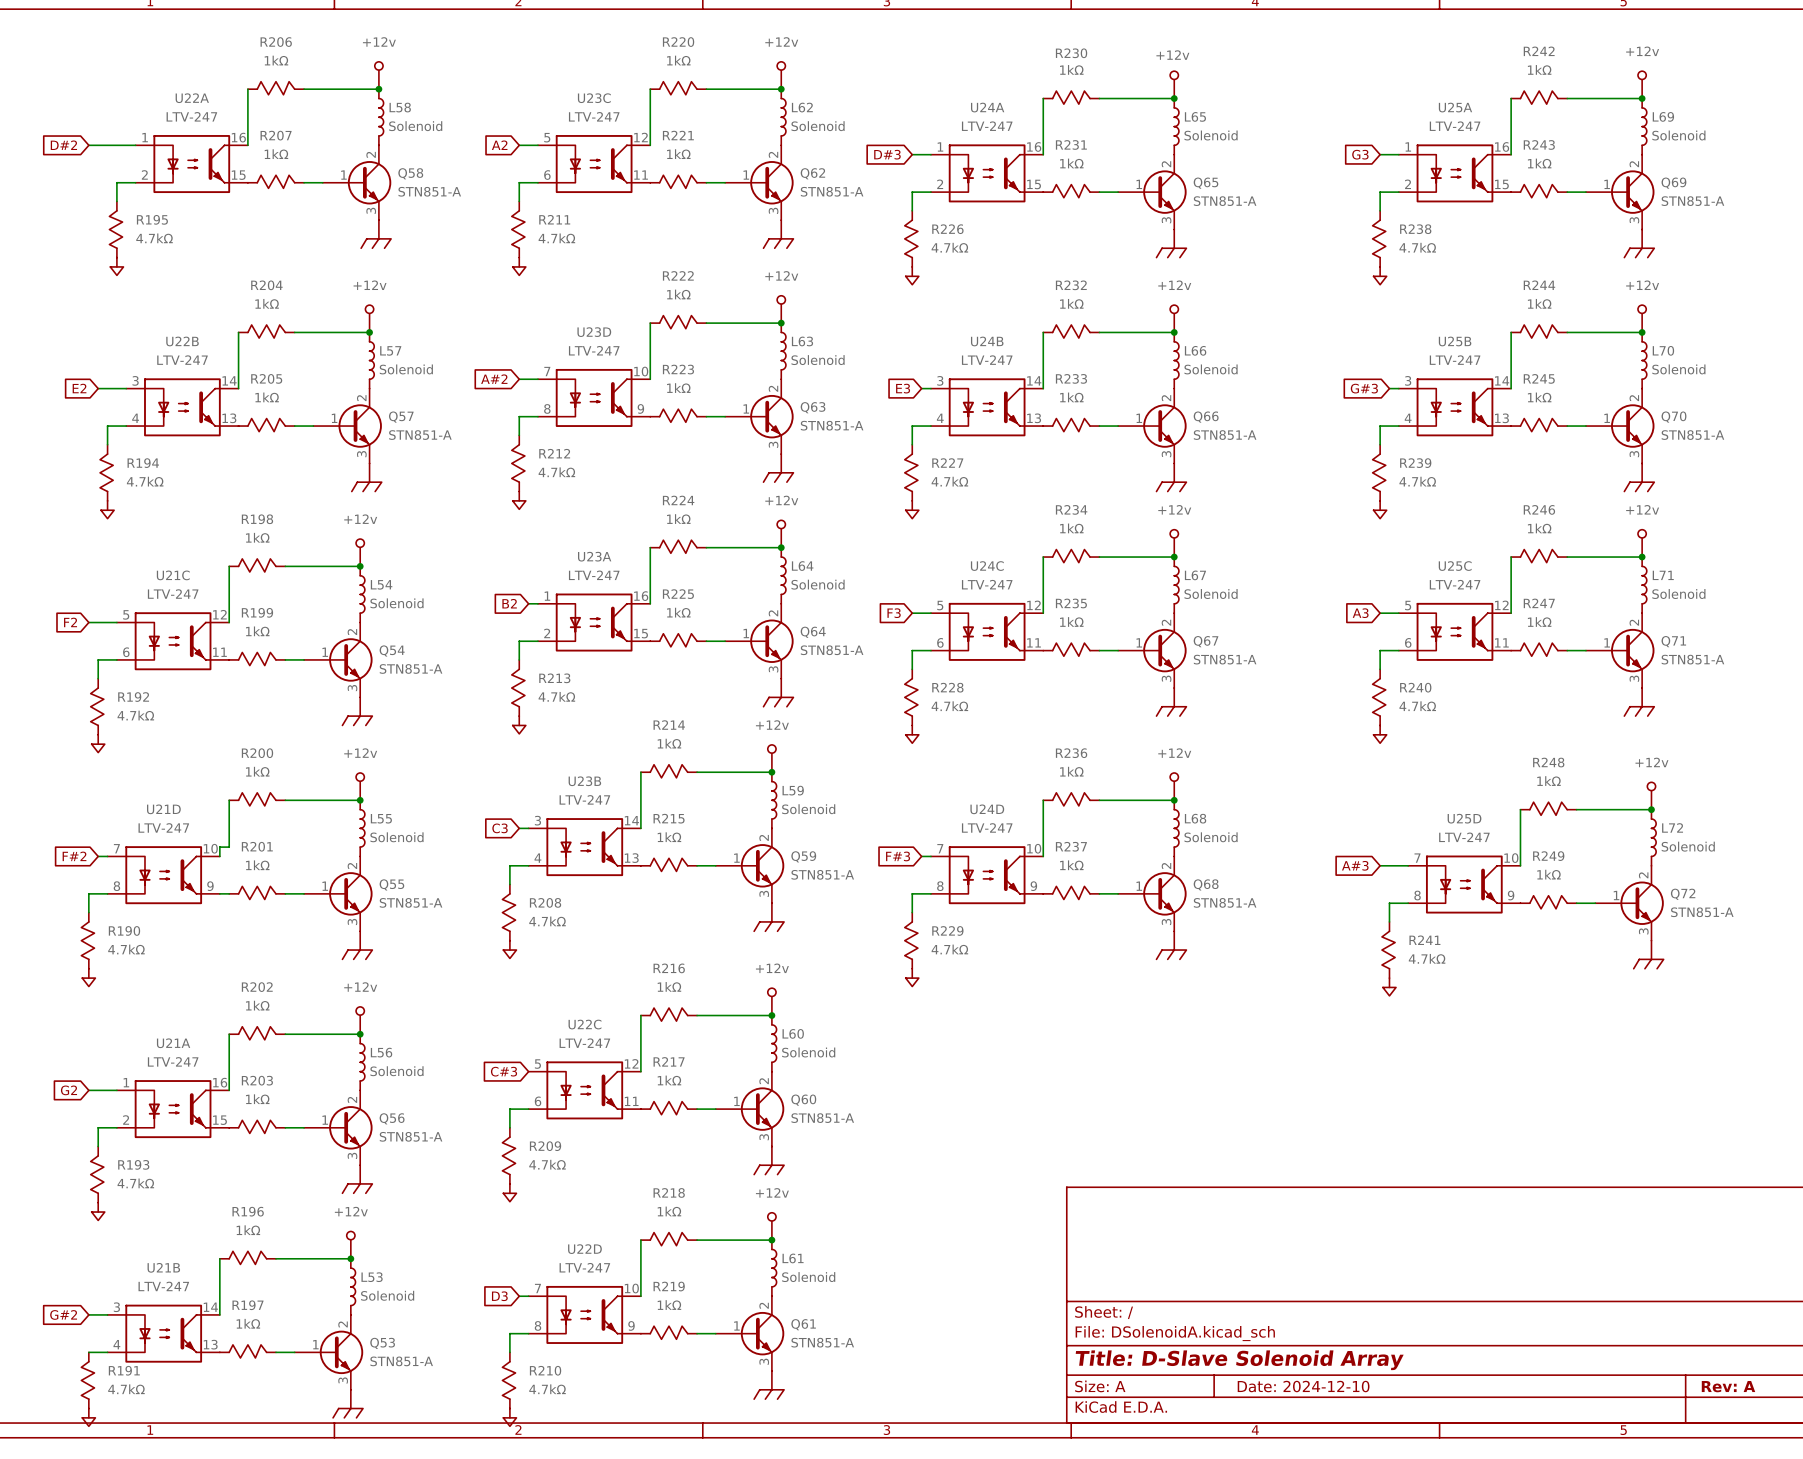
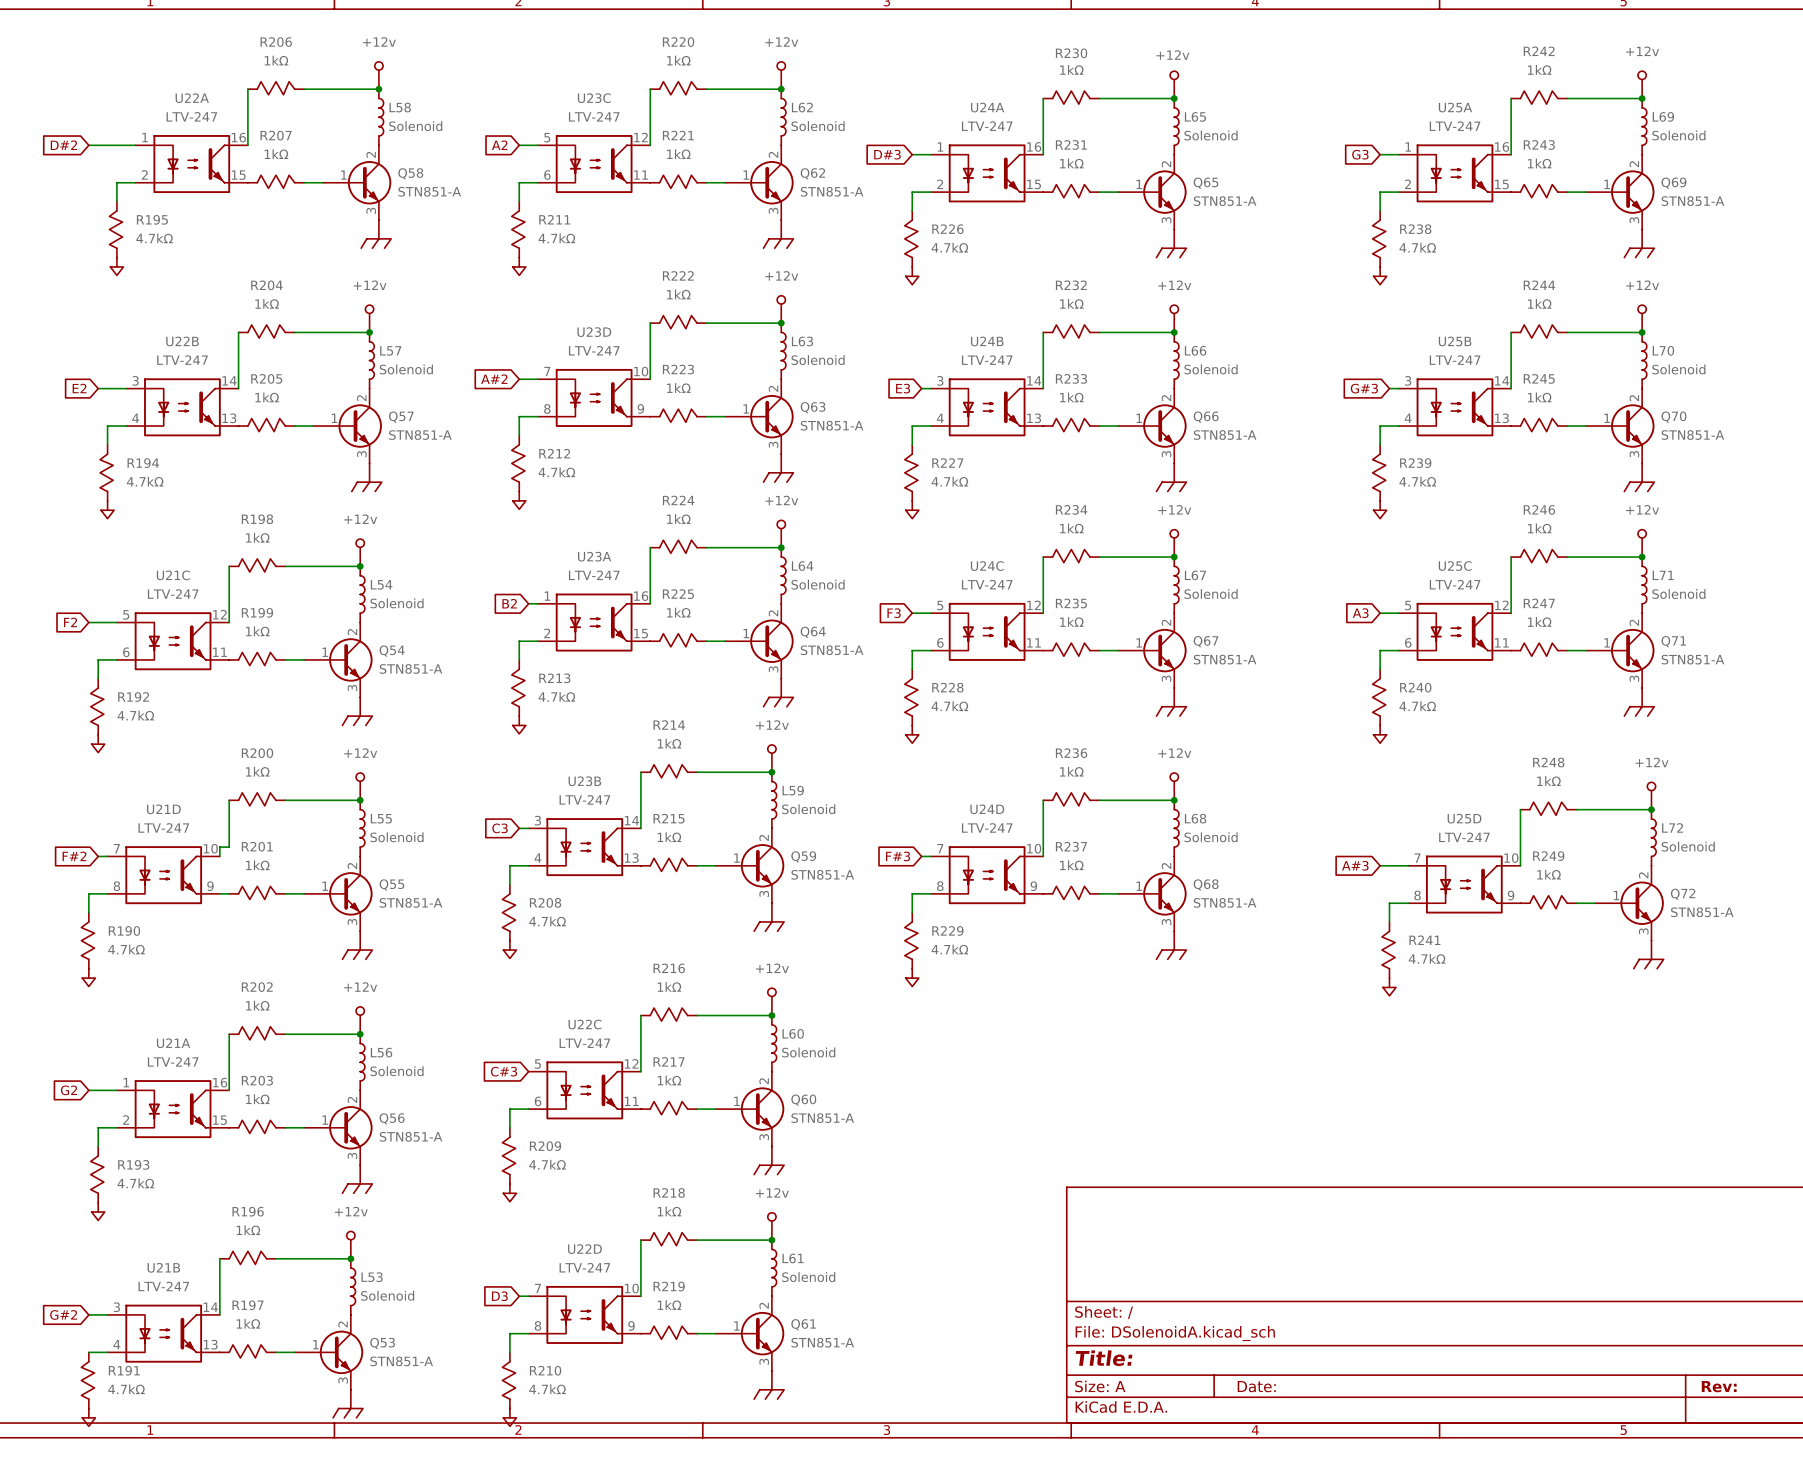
title block: Title: D-Slave Solenoid Array (1239, 1360) -> Title: (1104, 1358)
title block: Date: 2024-12-10 (1303, 1386) -> Date: (1256, 1386)
title block: Rev: A (1728, 1386) -> Rev: (1719, 1386)

